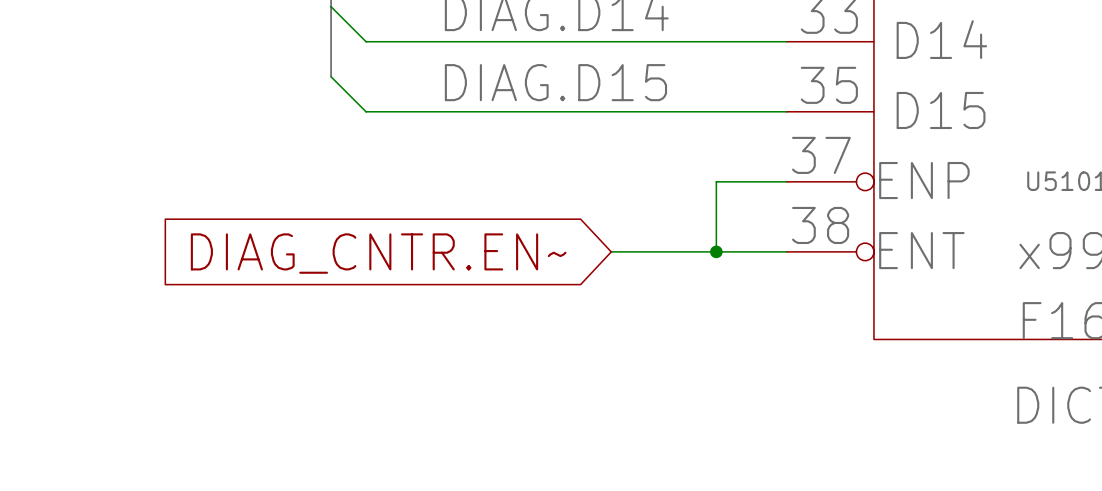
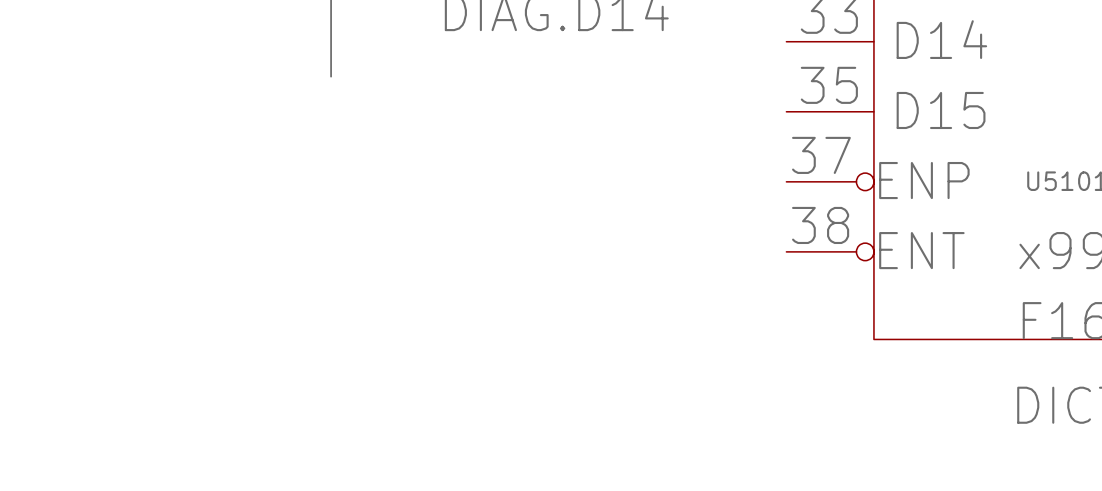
wire: (331, 6) (366, 41) (786, 41) -> none
wire: (331, 76) (366, 111) (786, 111) -> none
label: DIAG.D15 (555, 82) -> none
wire: (786, 181) (716, 181) (716, 251) -> none
wire: (611, 251) (786, 251) -> none
junction: (716, 251) -> none
global label: DIAG_CNTR.EN~ (378, 253) -> none

